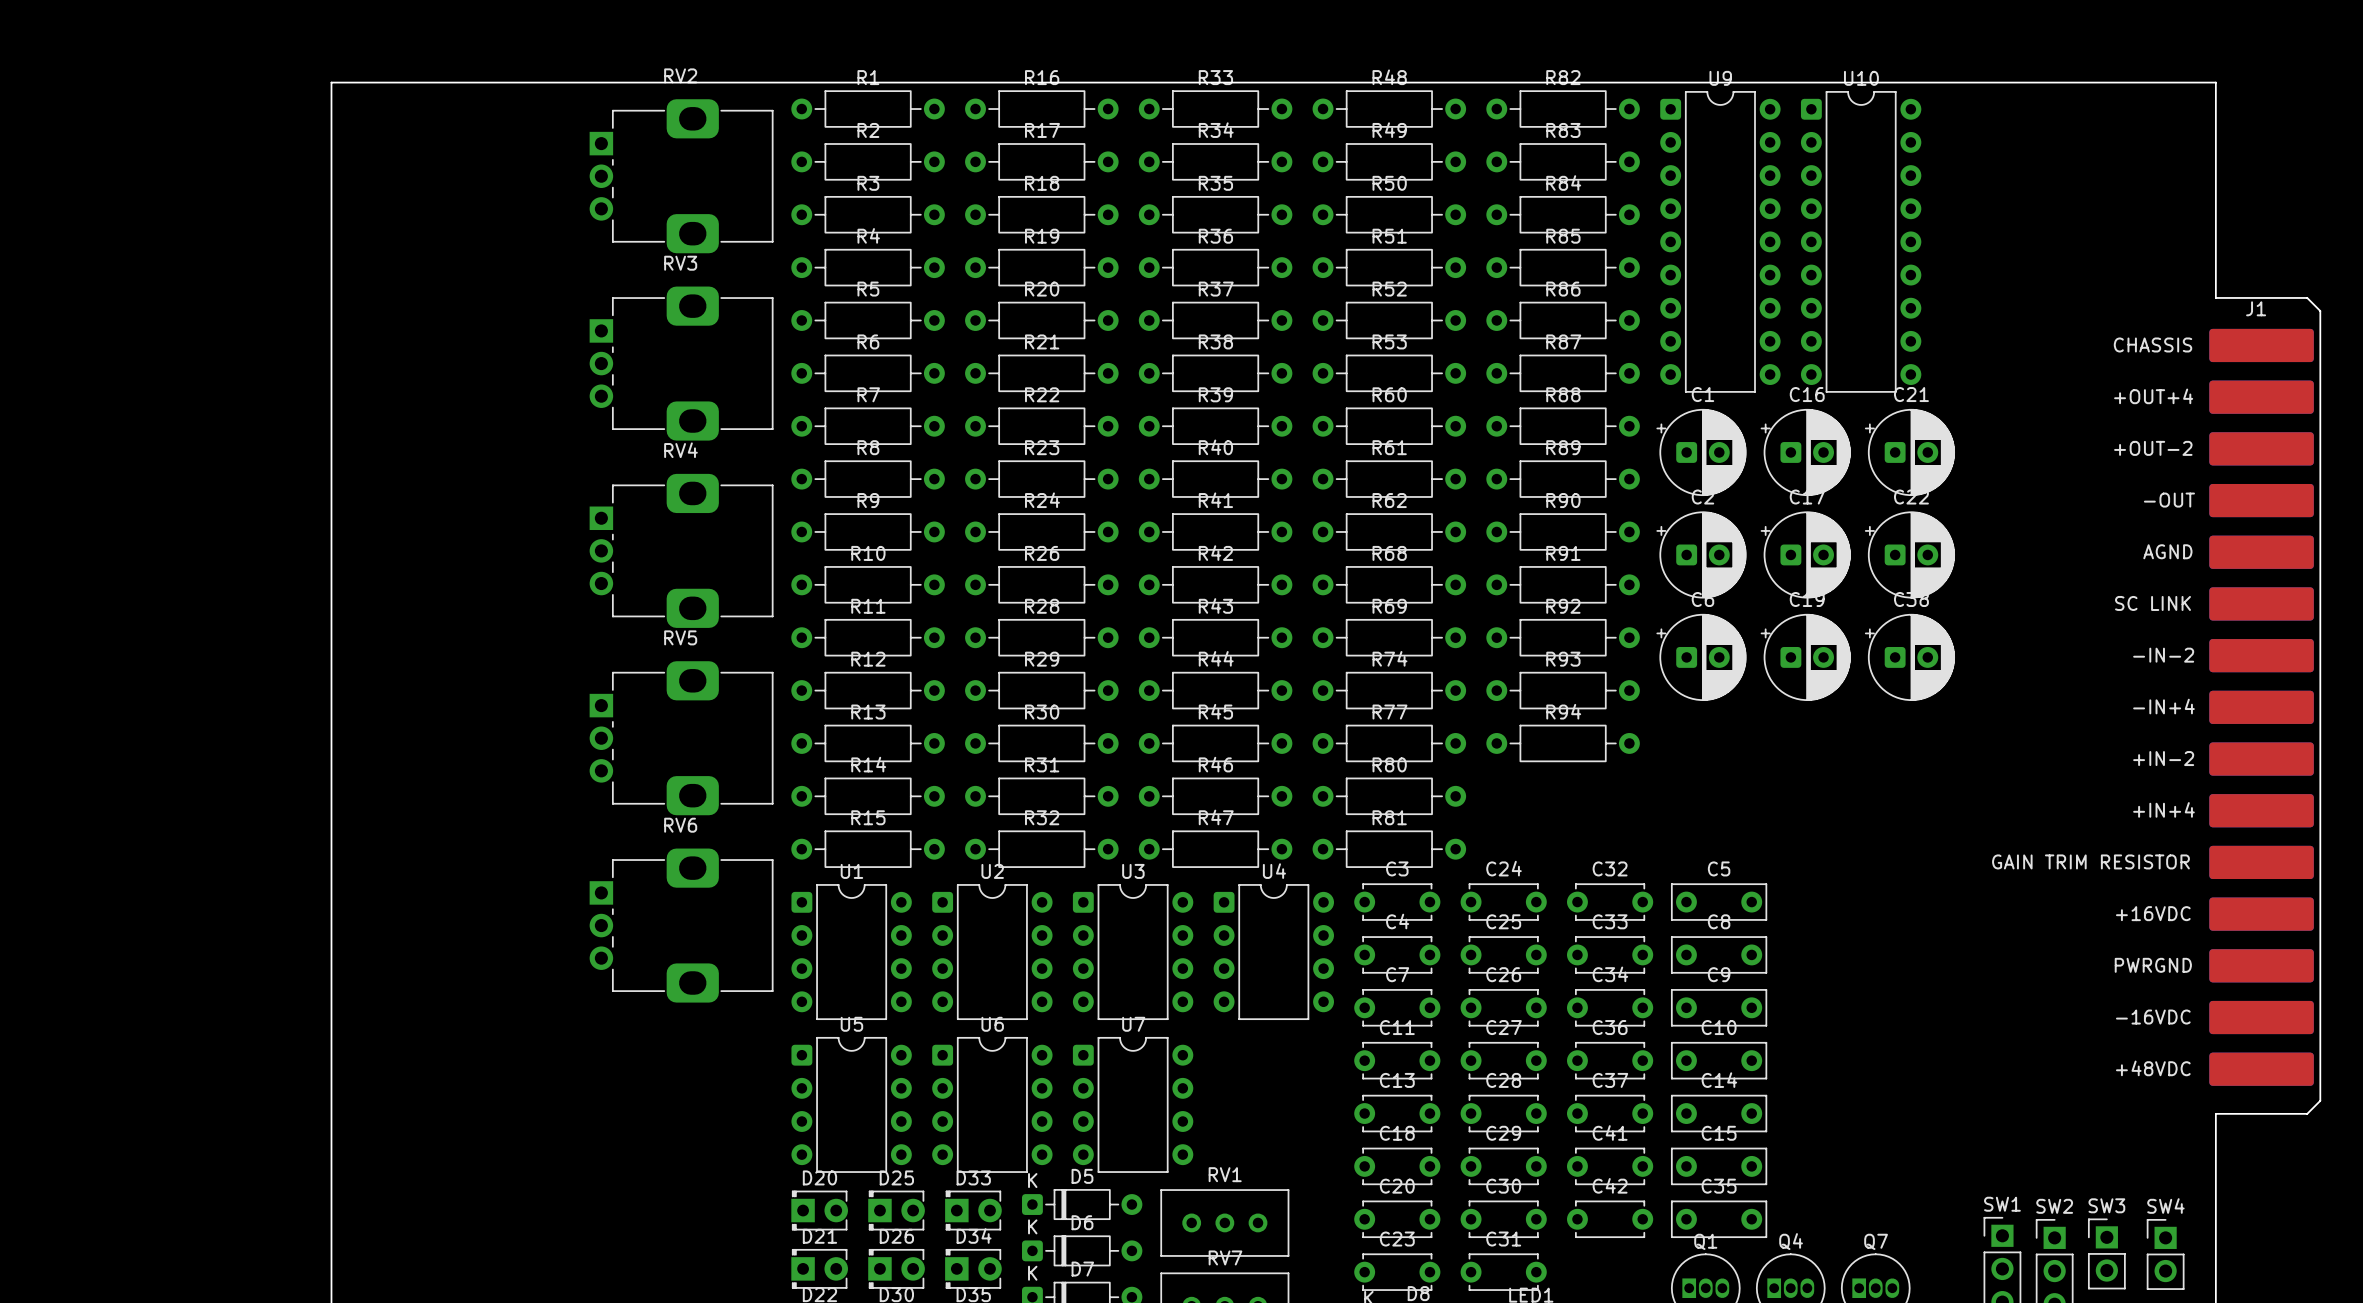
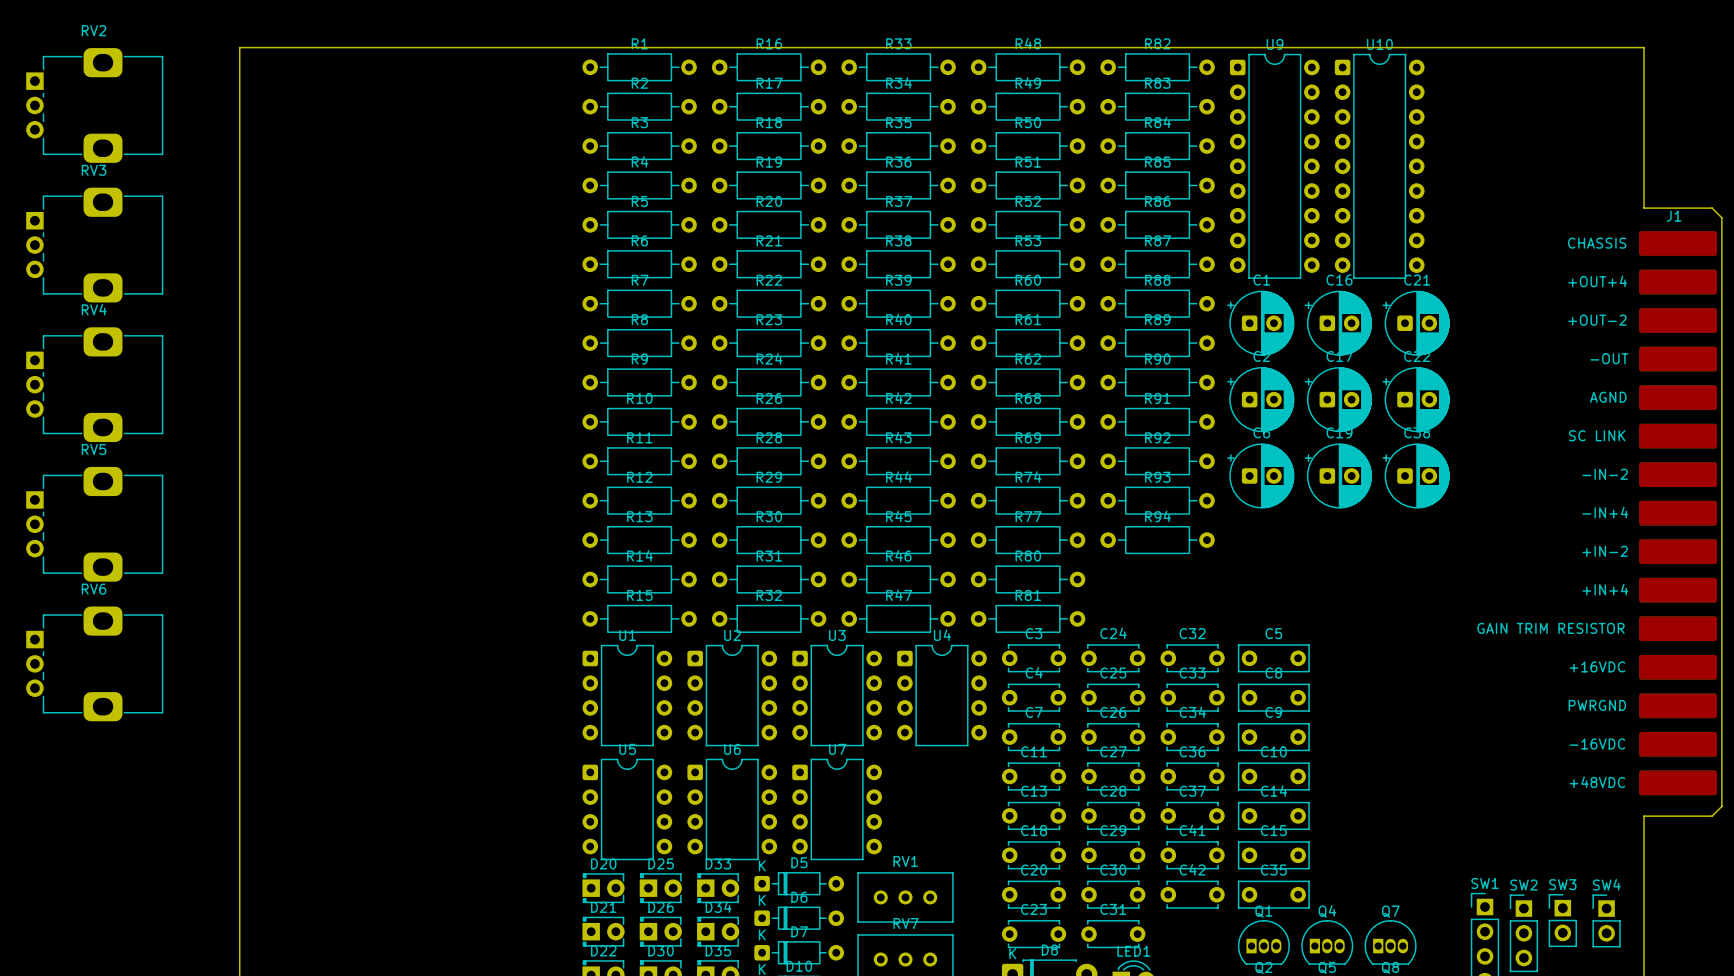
RV2 position: (681, 176) -> (94, 105)
RV3 position: (681, 363) -> (94, 245)
RV4 position: (681, 550) -> (94, 384)
RV5 position: (681, 738) -> (94, 524)
RV6 position: (681, 925) -> (94, 663)

